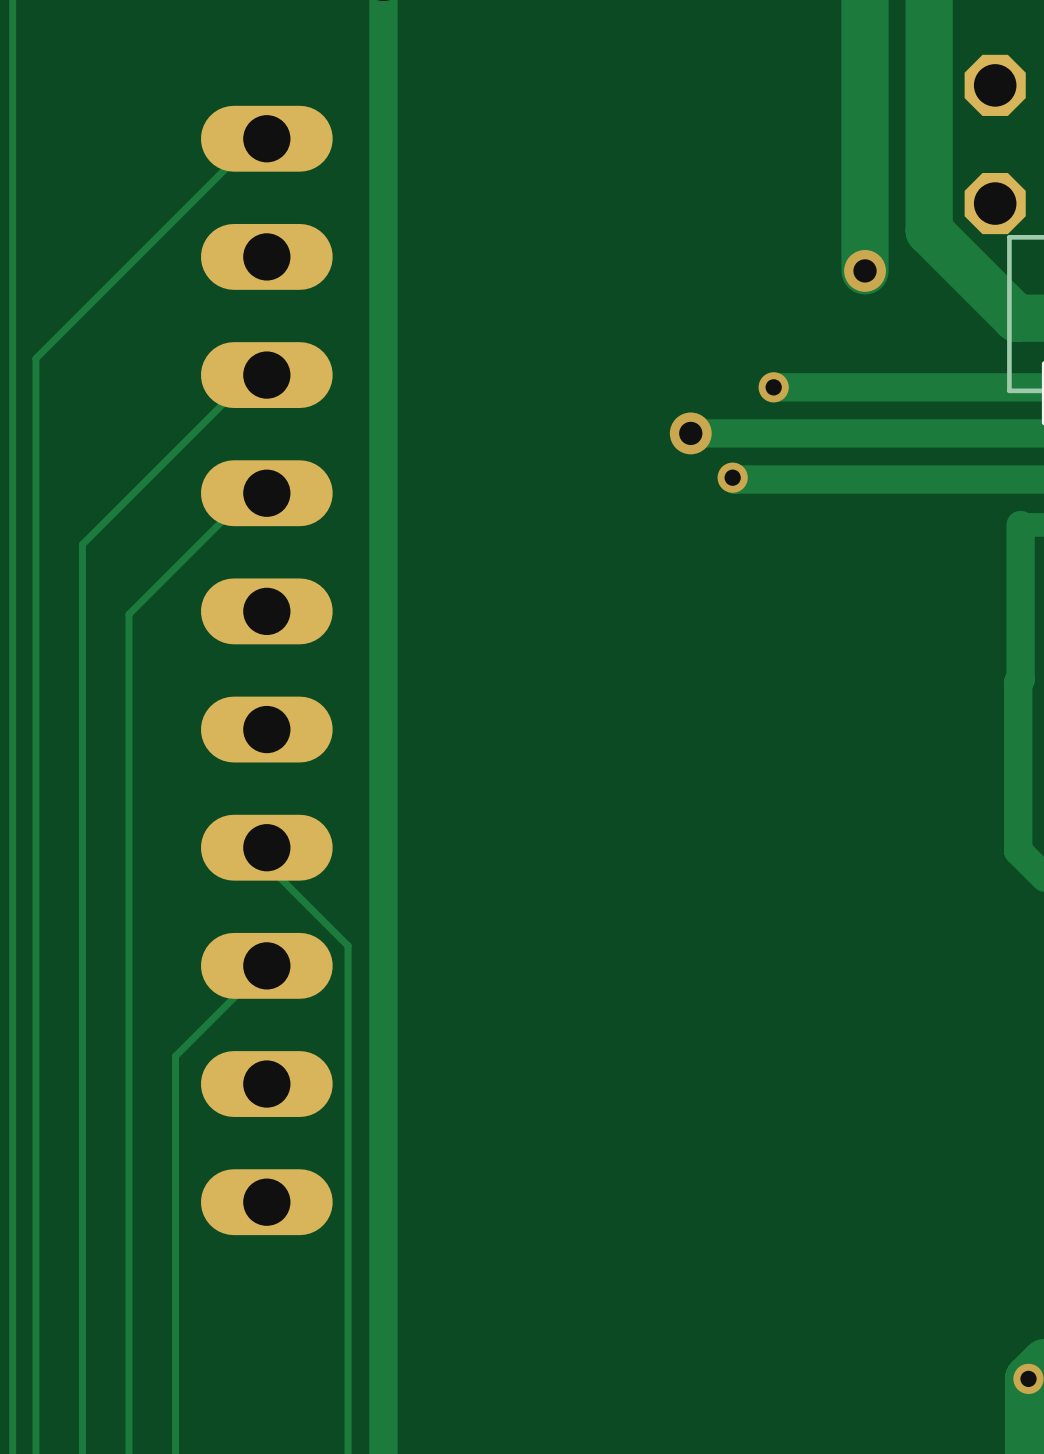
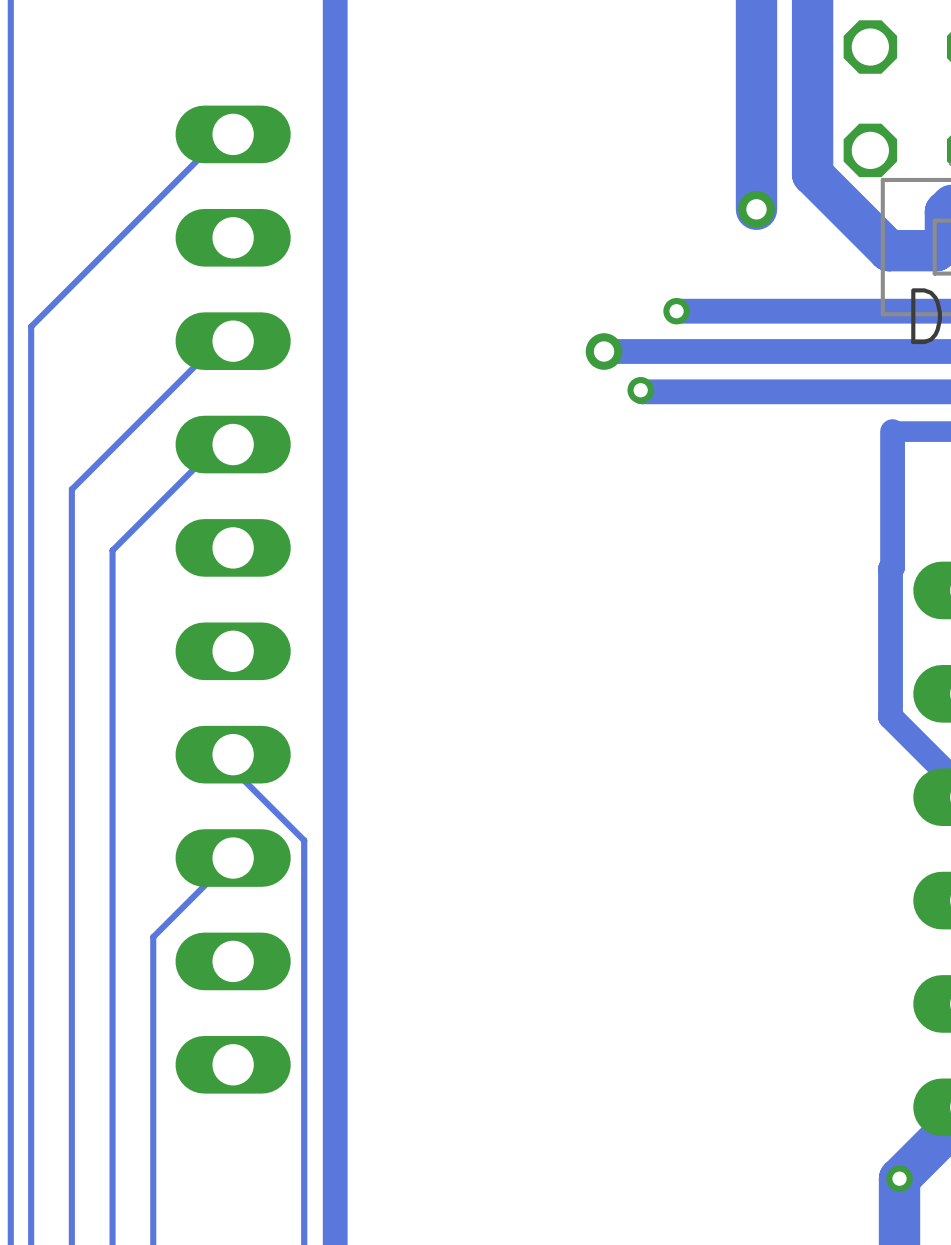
track: (266, 138) (245, 149) (35, 358) (35, 404) -> (233, 134) (214, 143) (31, 326)
track: (266, 375) (245, 381) (82, 544) (82, 591) -> (233, 341) (214, 346) (71, 489)
track: (266, 493) (245, 498) (128, 614) (128, 660) -> (233, 444) (214, 448) (112, 550)
part position: (266, 670) -> (233, 599)
track: (266, 847) (266, 864) (348, 945) (348, 992) -> (233, 754) (233, 769) (304, 840)
track: (266, 965) (175, 1056) (175, 1102) -> (233, 858) (153, 937)

